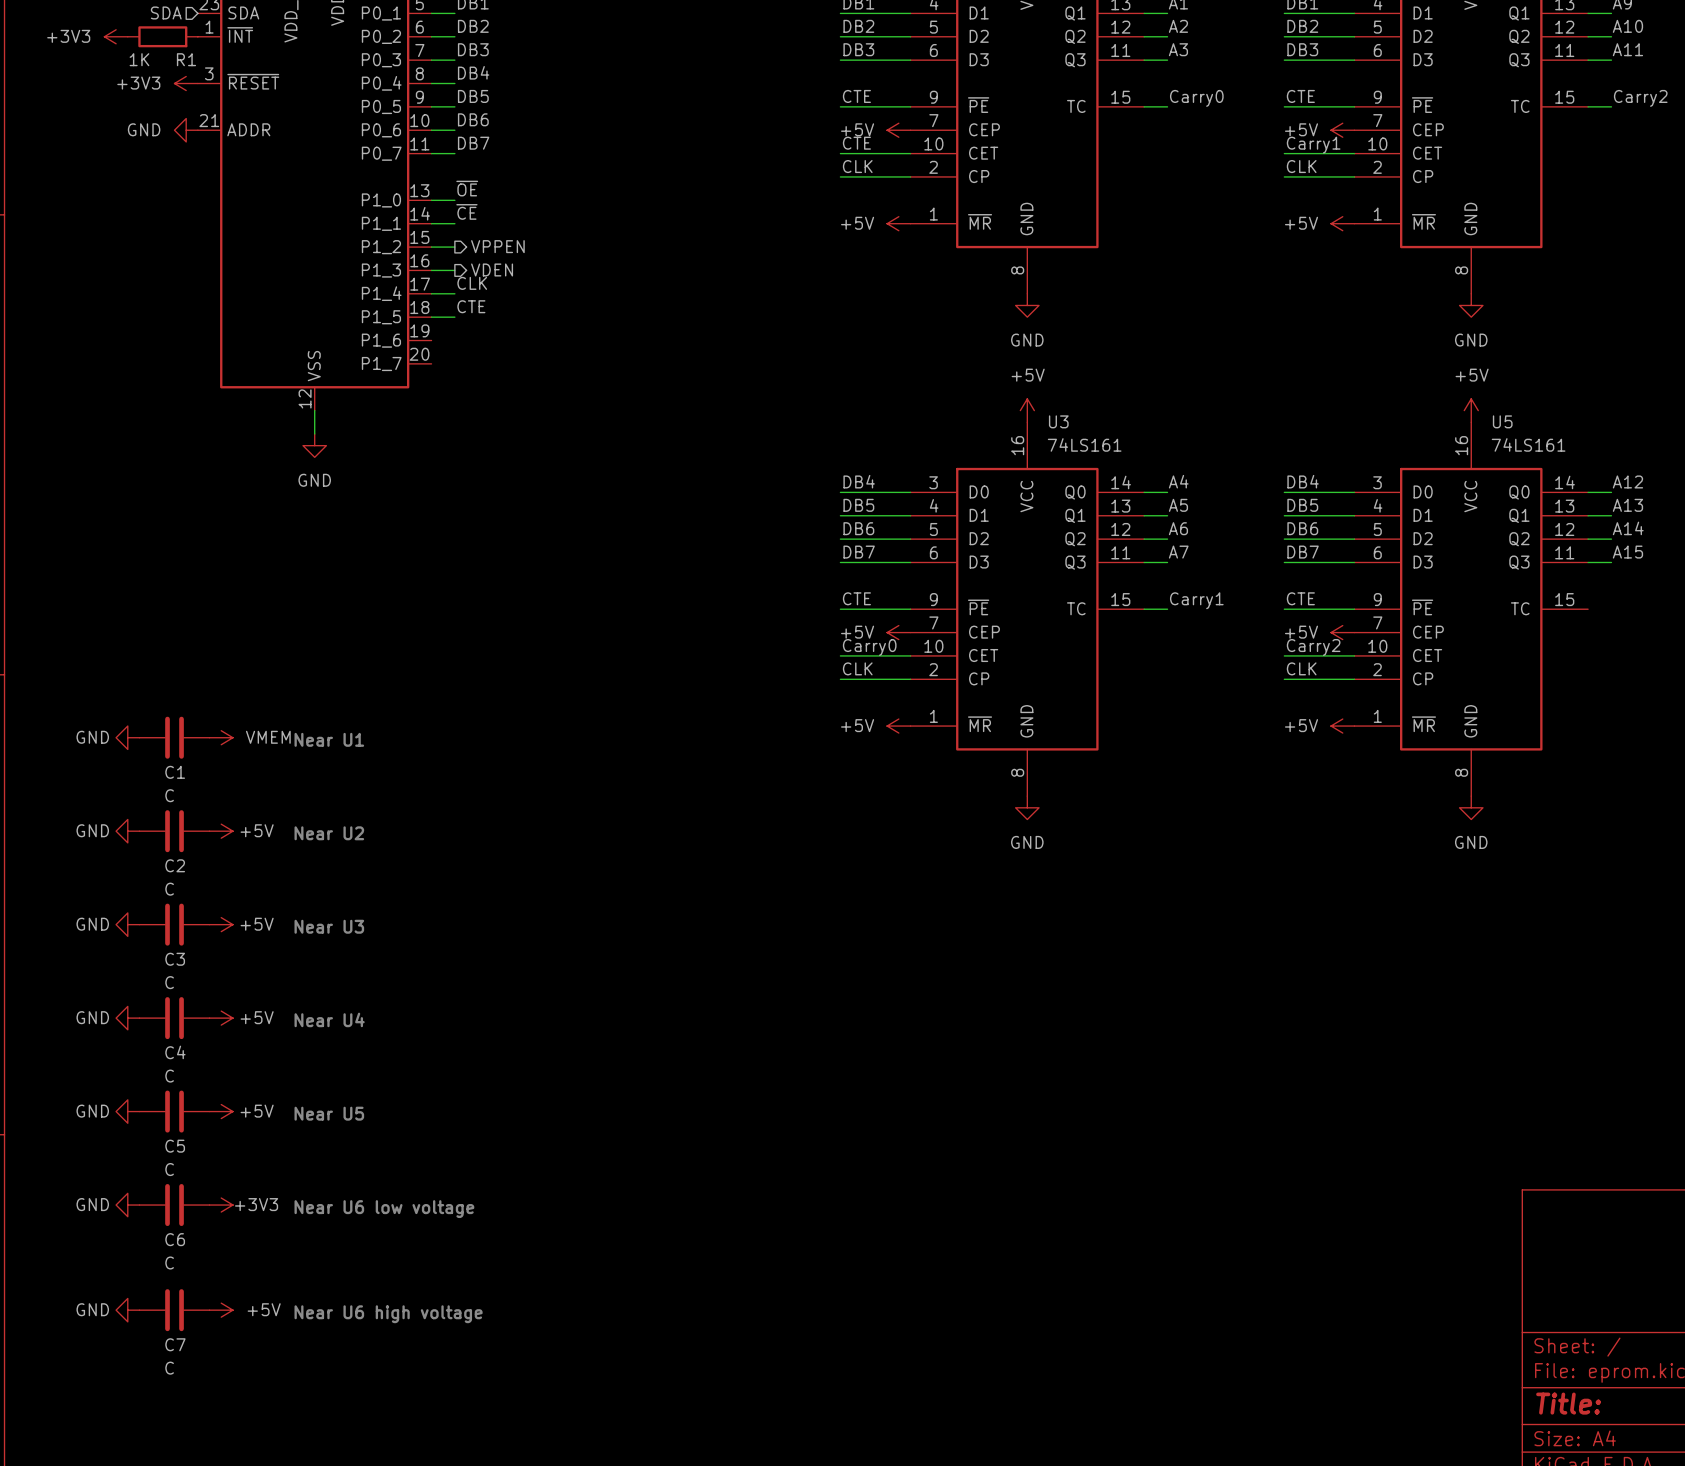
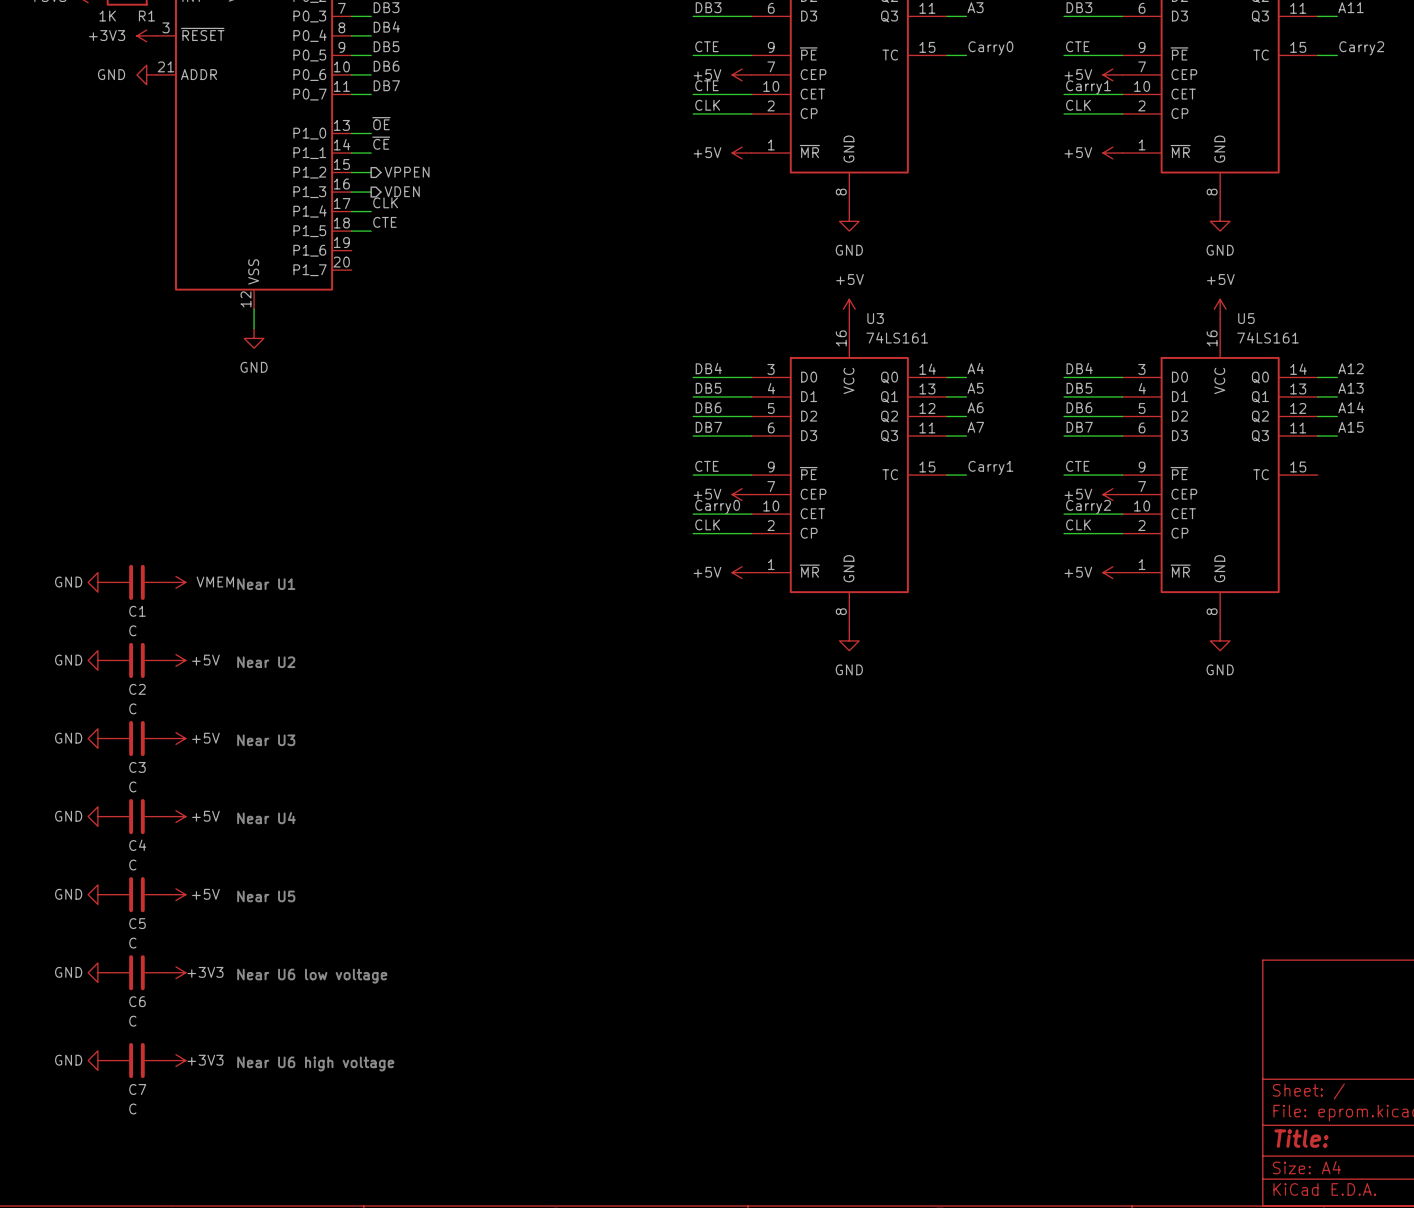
power symbol: +5V (221, 1310) -> +3V3 (175, 1060)

